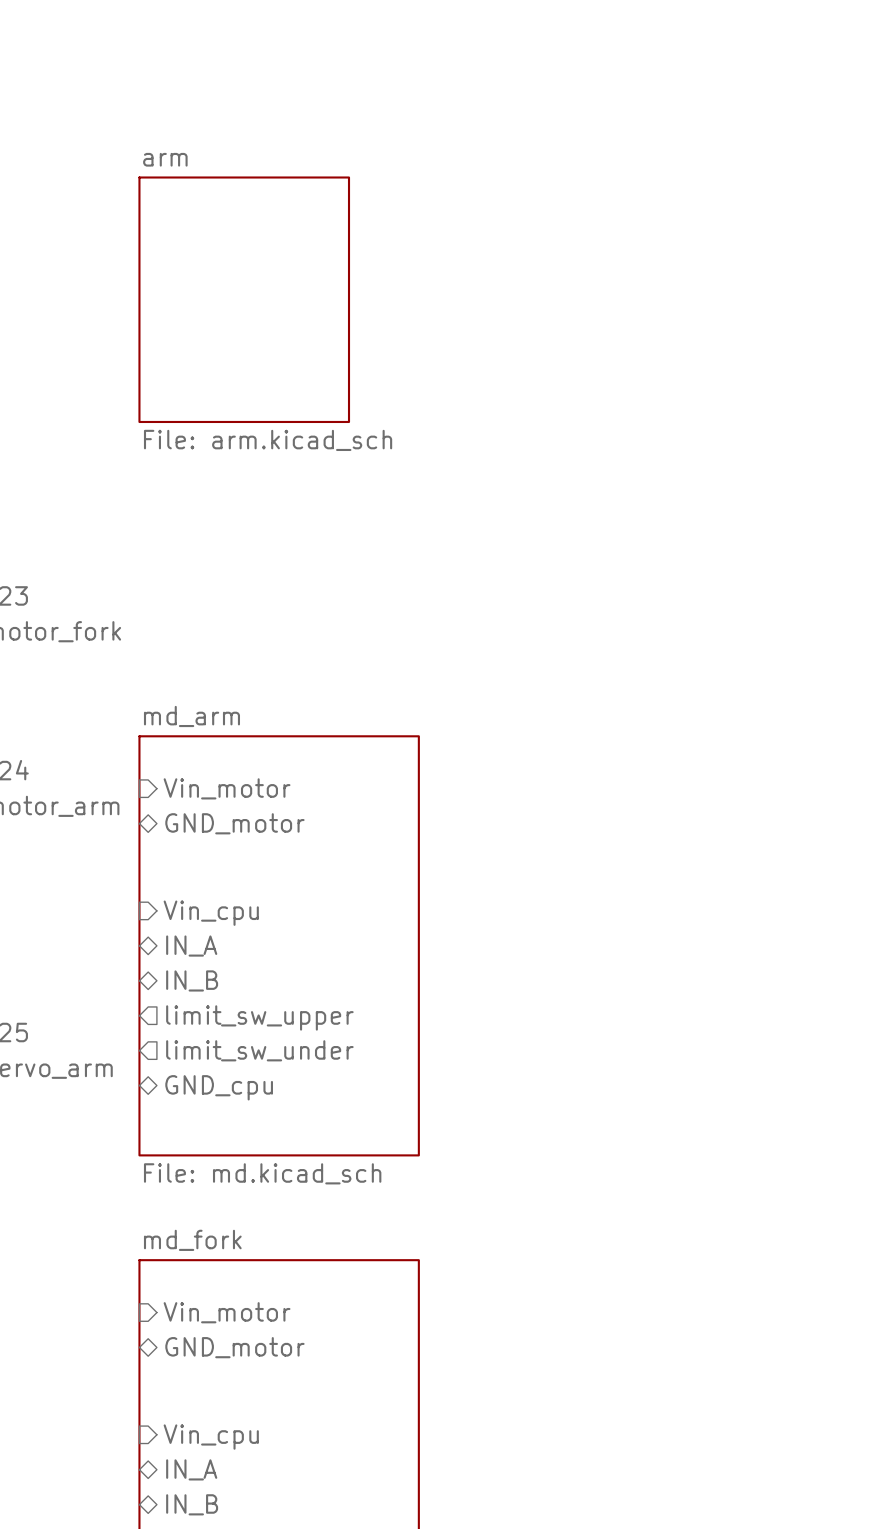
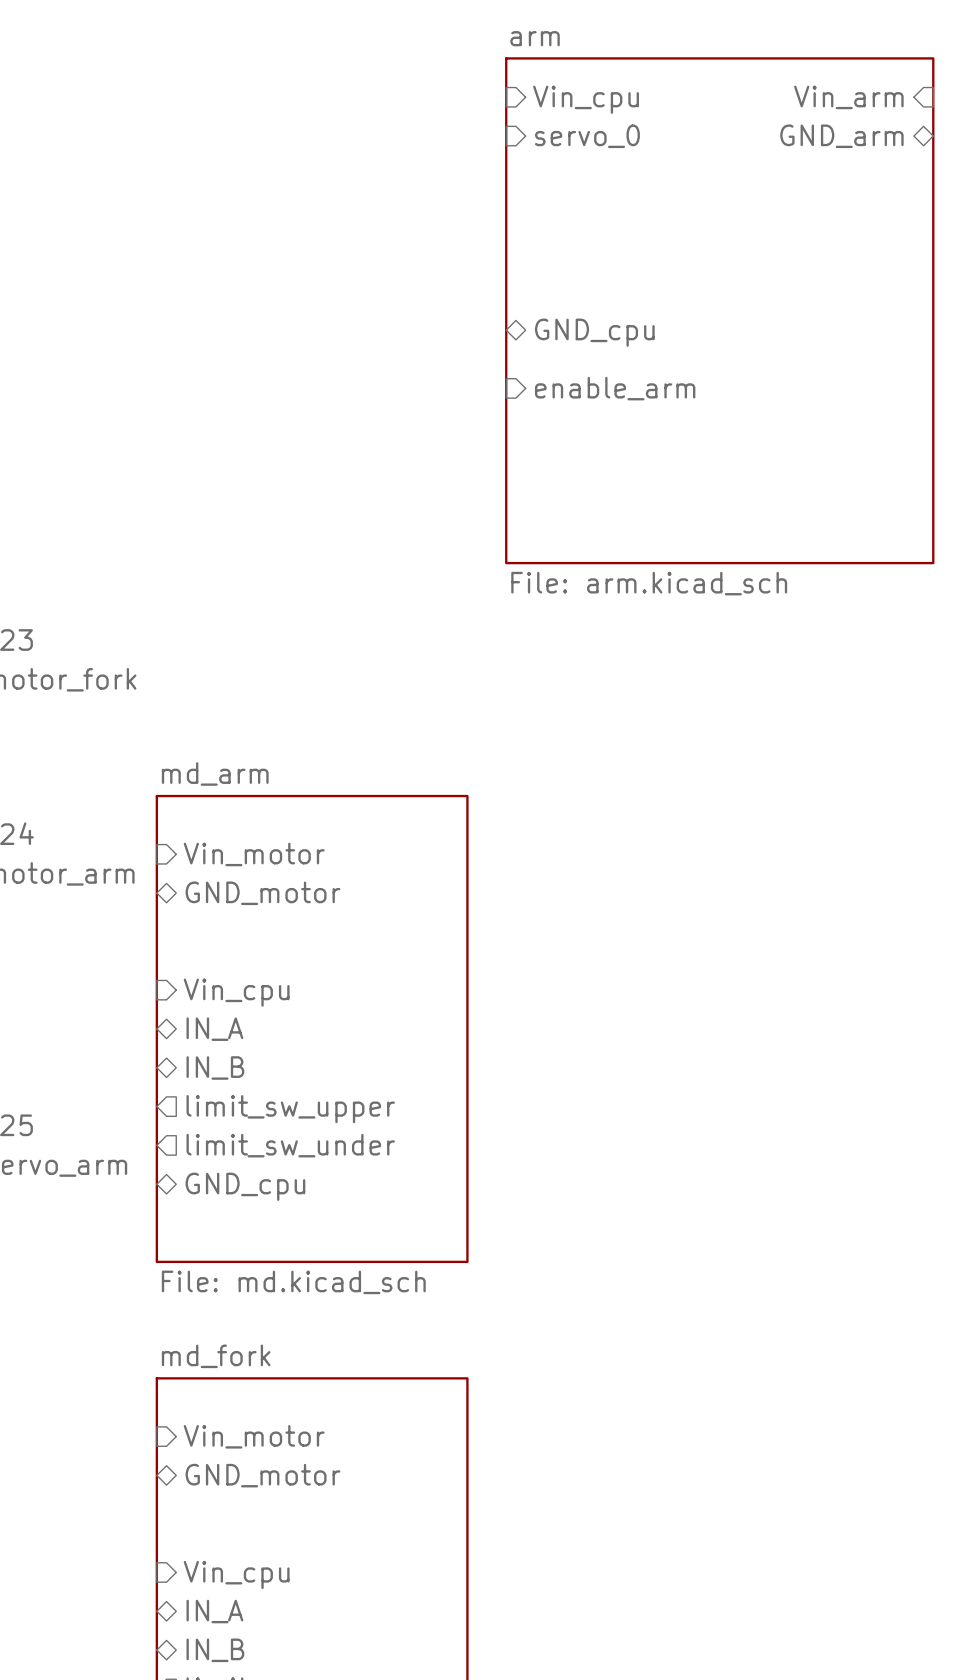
sheet pin: none -> Vin_arm (848, 97)
sheet pin: none -> Vin_cpu (586, 99)
sheet pin: none -> servo_0 (587, 136)
sheet pin: none -> GND_arm (841, 136)
sheet arm: File: arm.kicad_sch (244, 299) -> none
sheet arm: none -> File: arm.kicad_sch (719, 310)
sheet pin: none -> GND_cpu (594, 332)
sheet pin: none -> enable_arm (615, 388)

